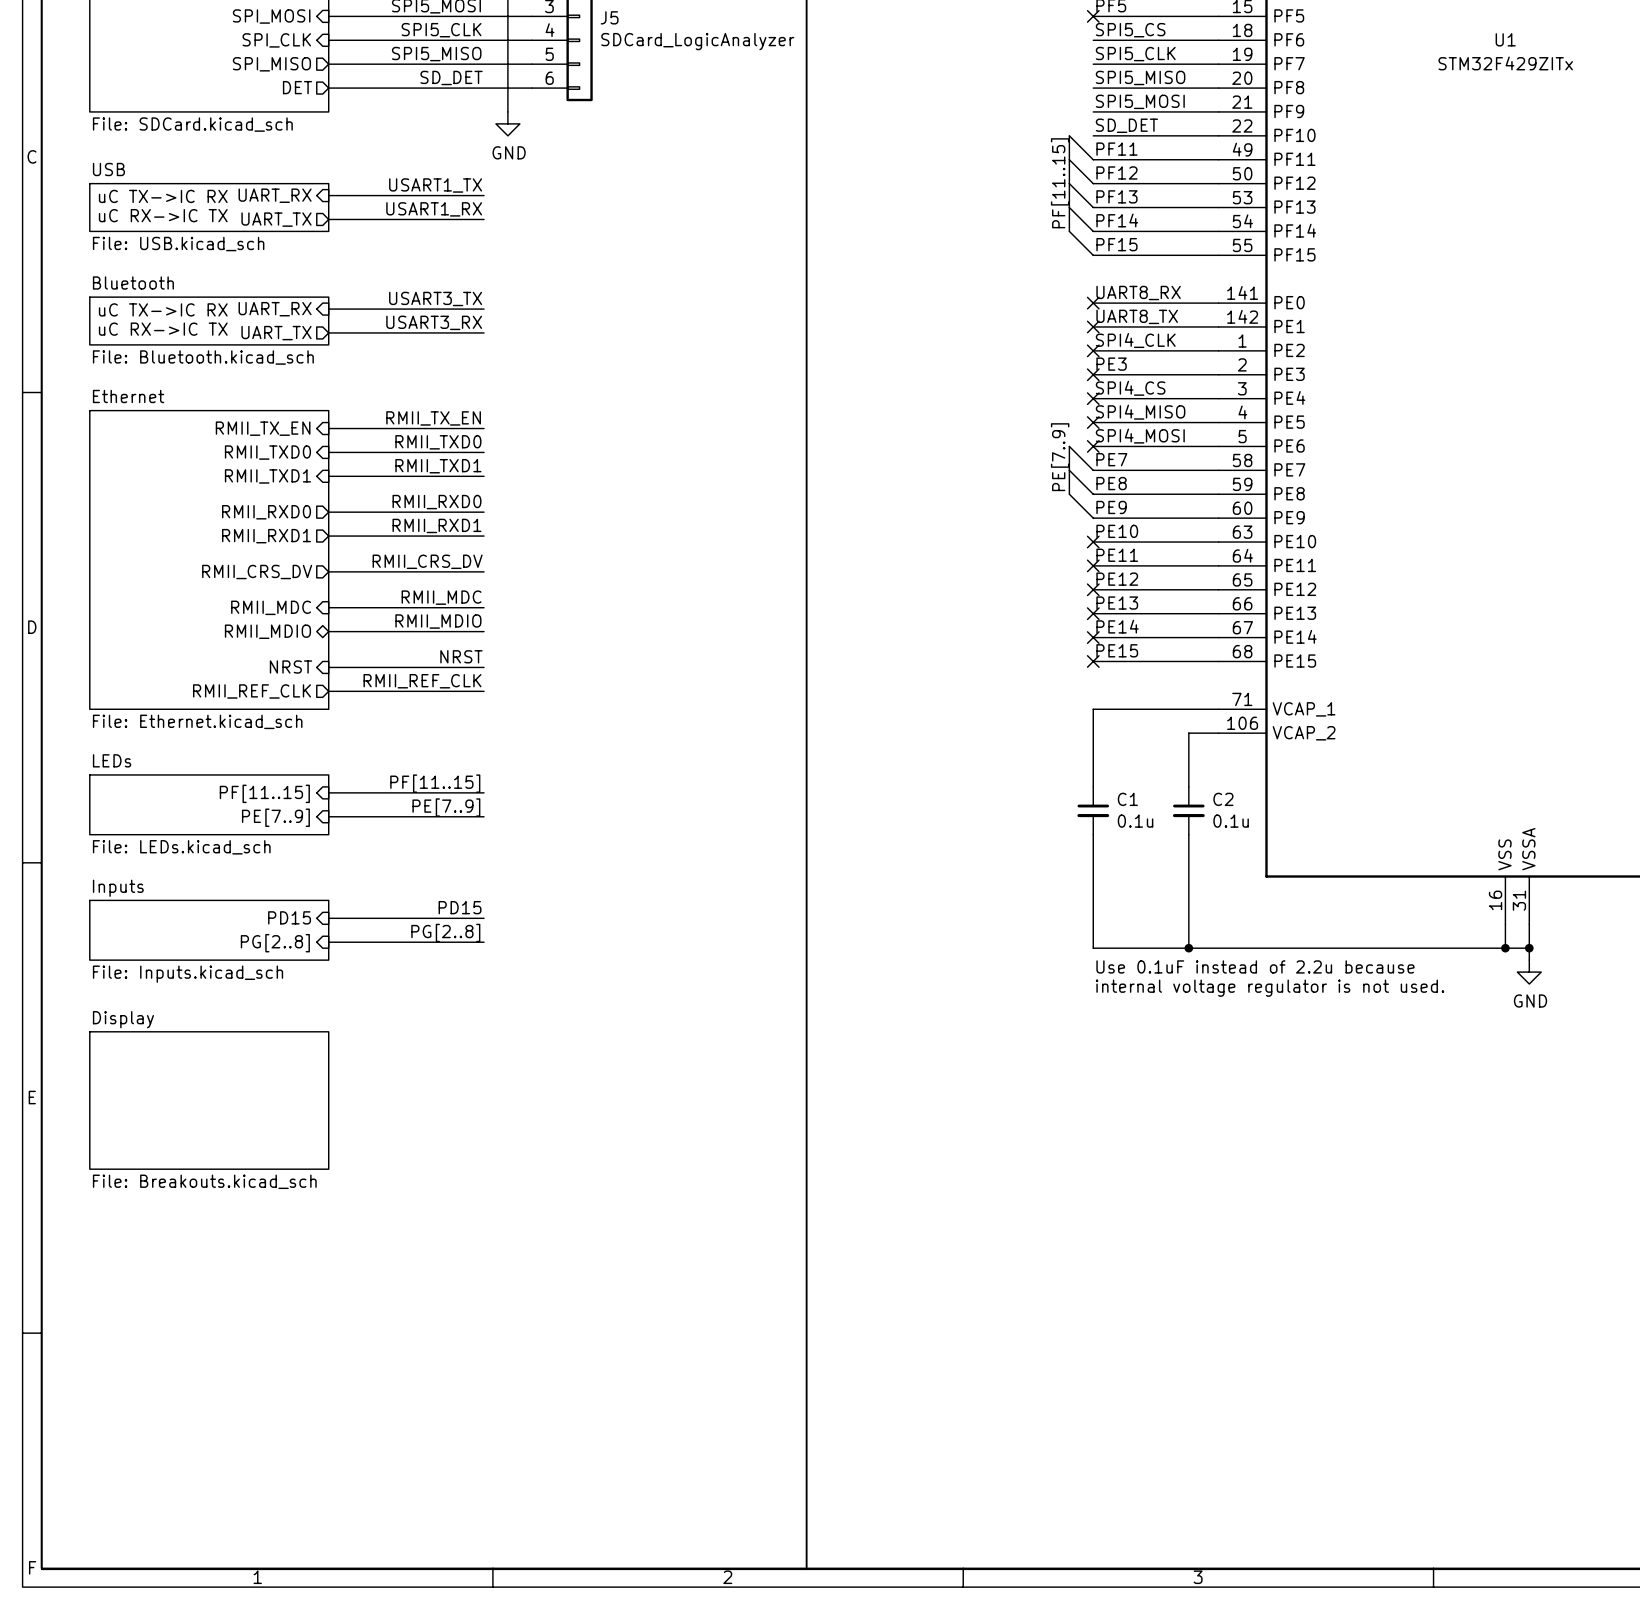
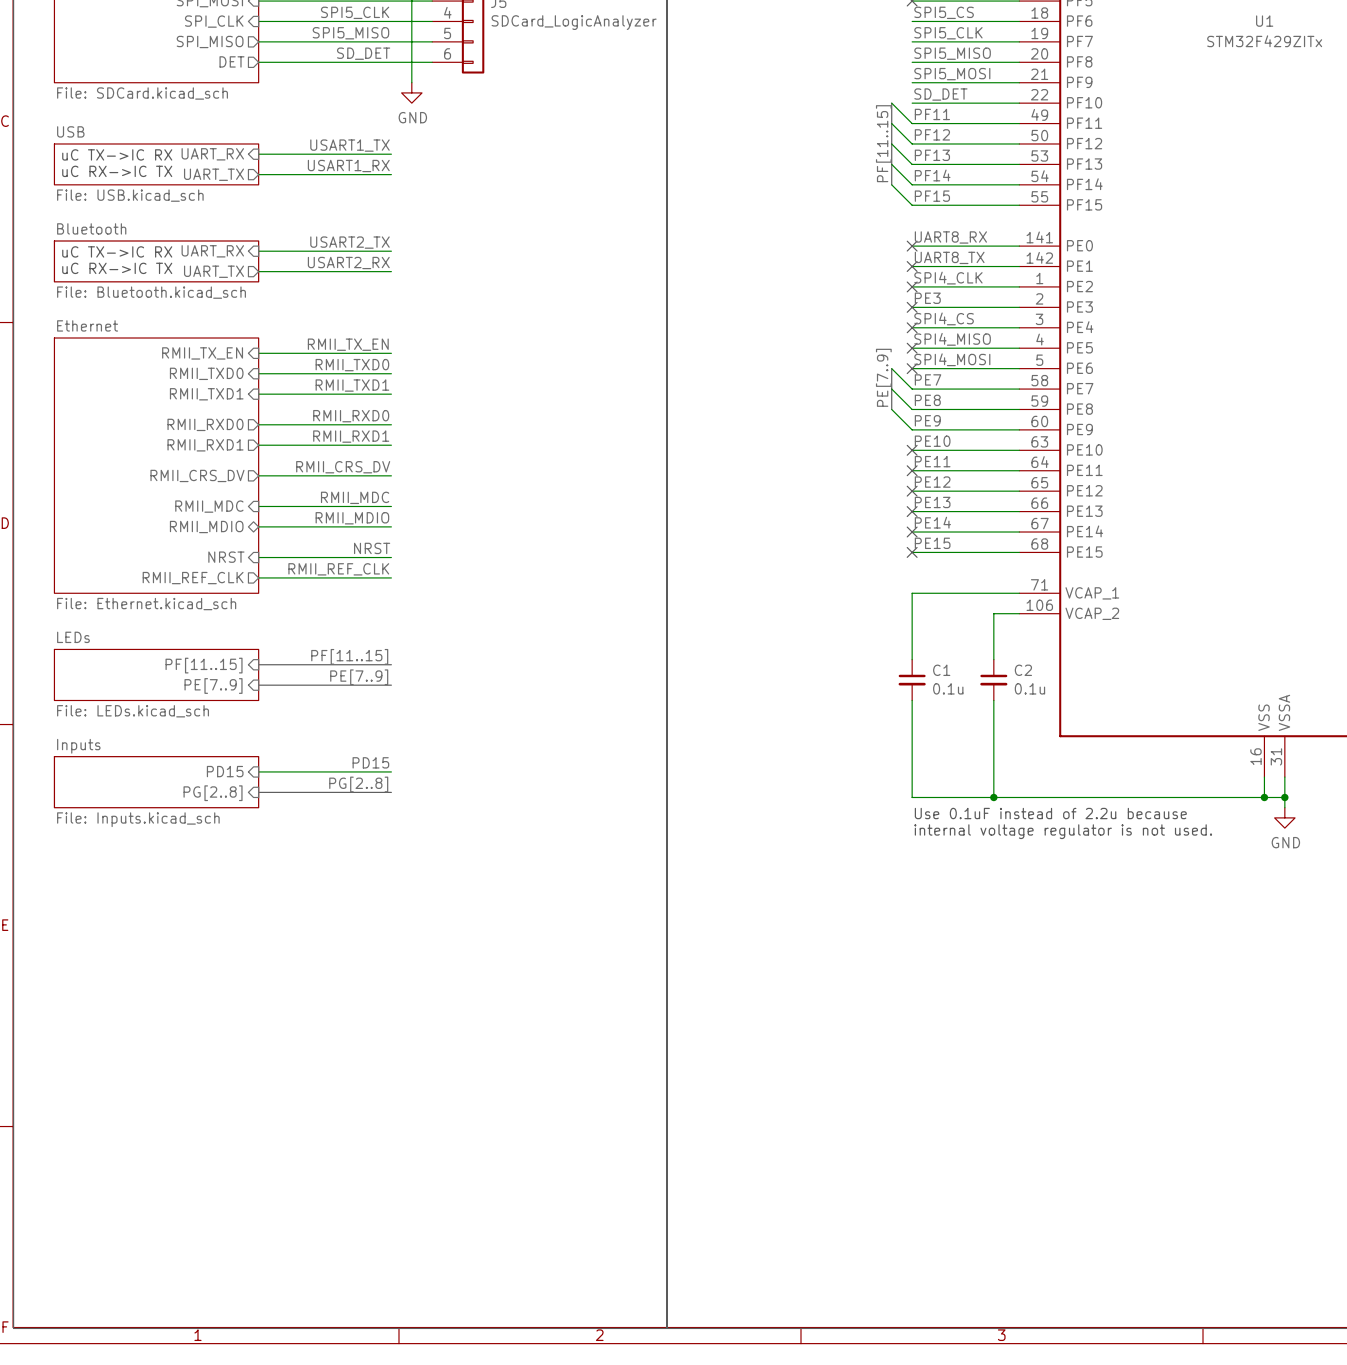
label: USART3_TX (435, 298) -> USART2_TX (349, 242)
label: USART3_RX (434, 322) -> USART2_RX (348, 263)
sheet Display: File: Breakouts.kicad_sch (209, 1100) -> none

